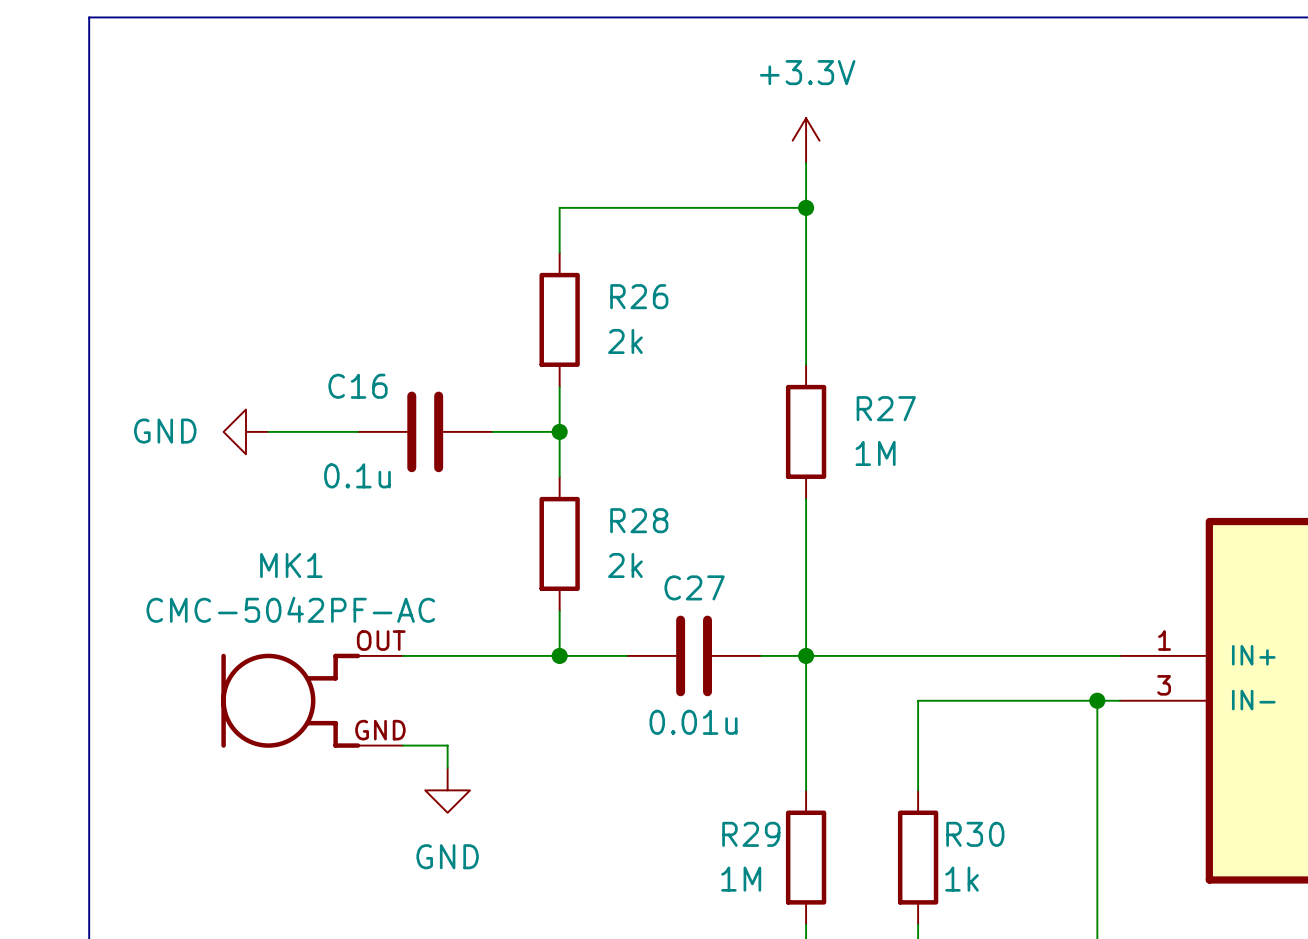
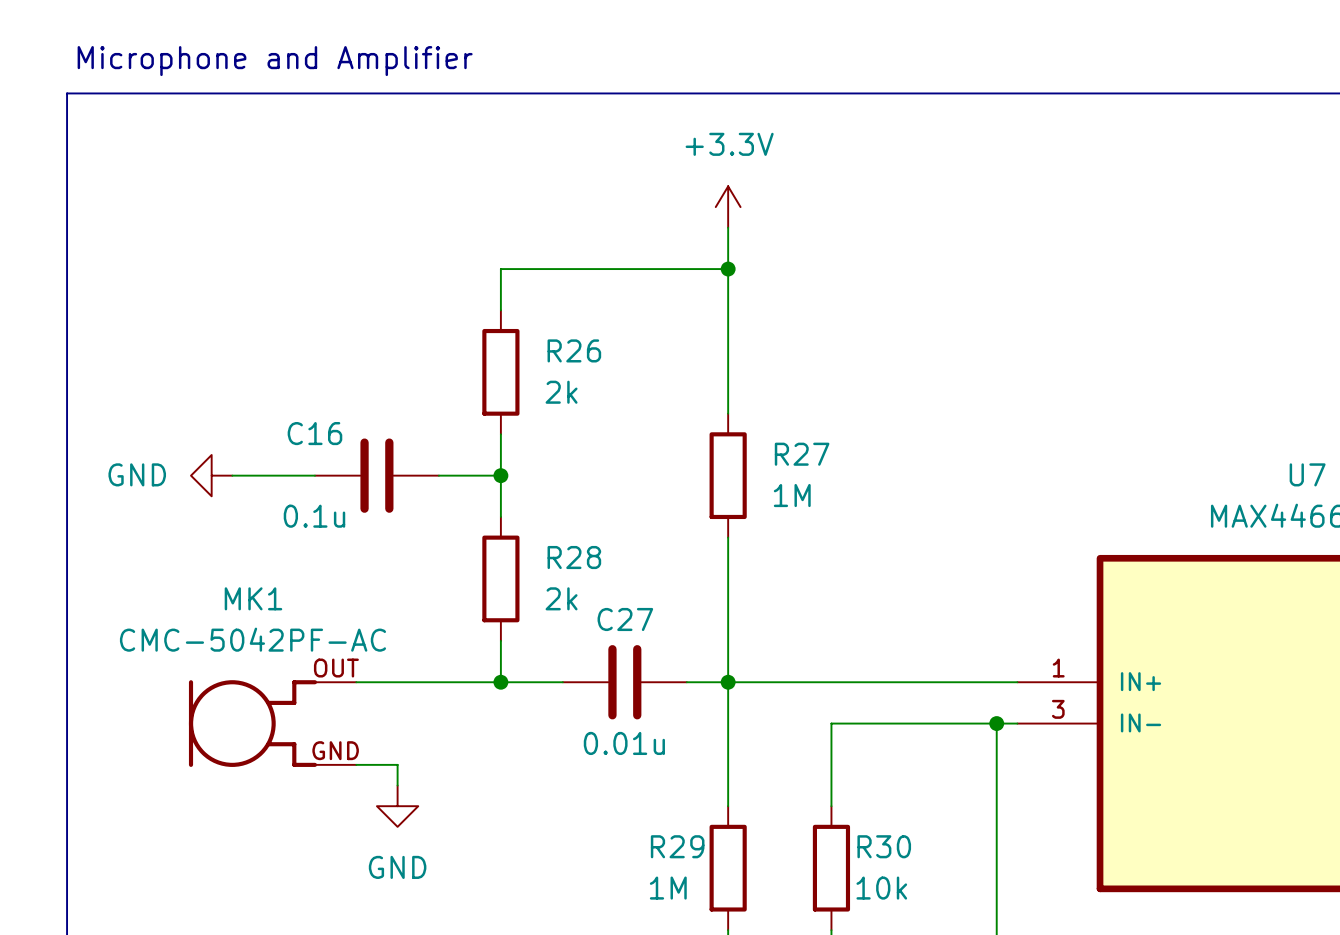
R30 value: 1k (962, 879) -> 10k (881, 888)

